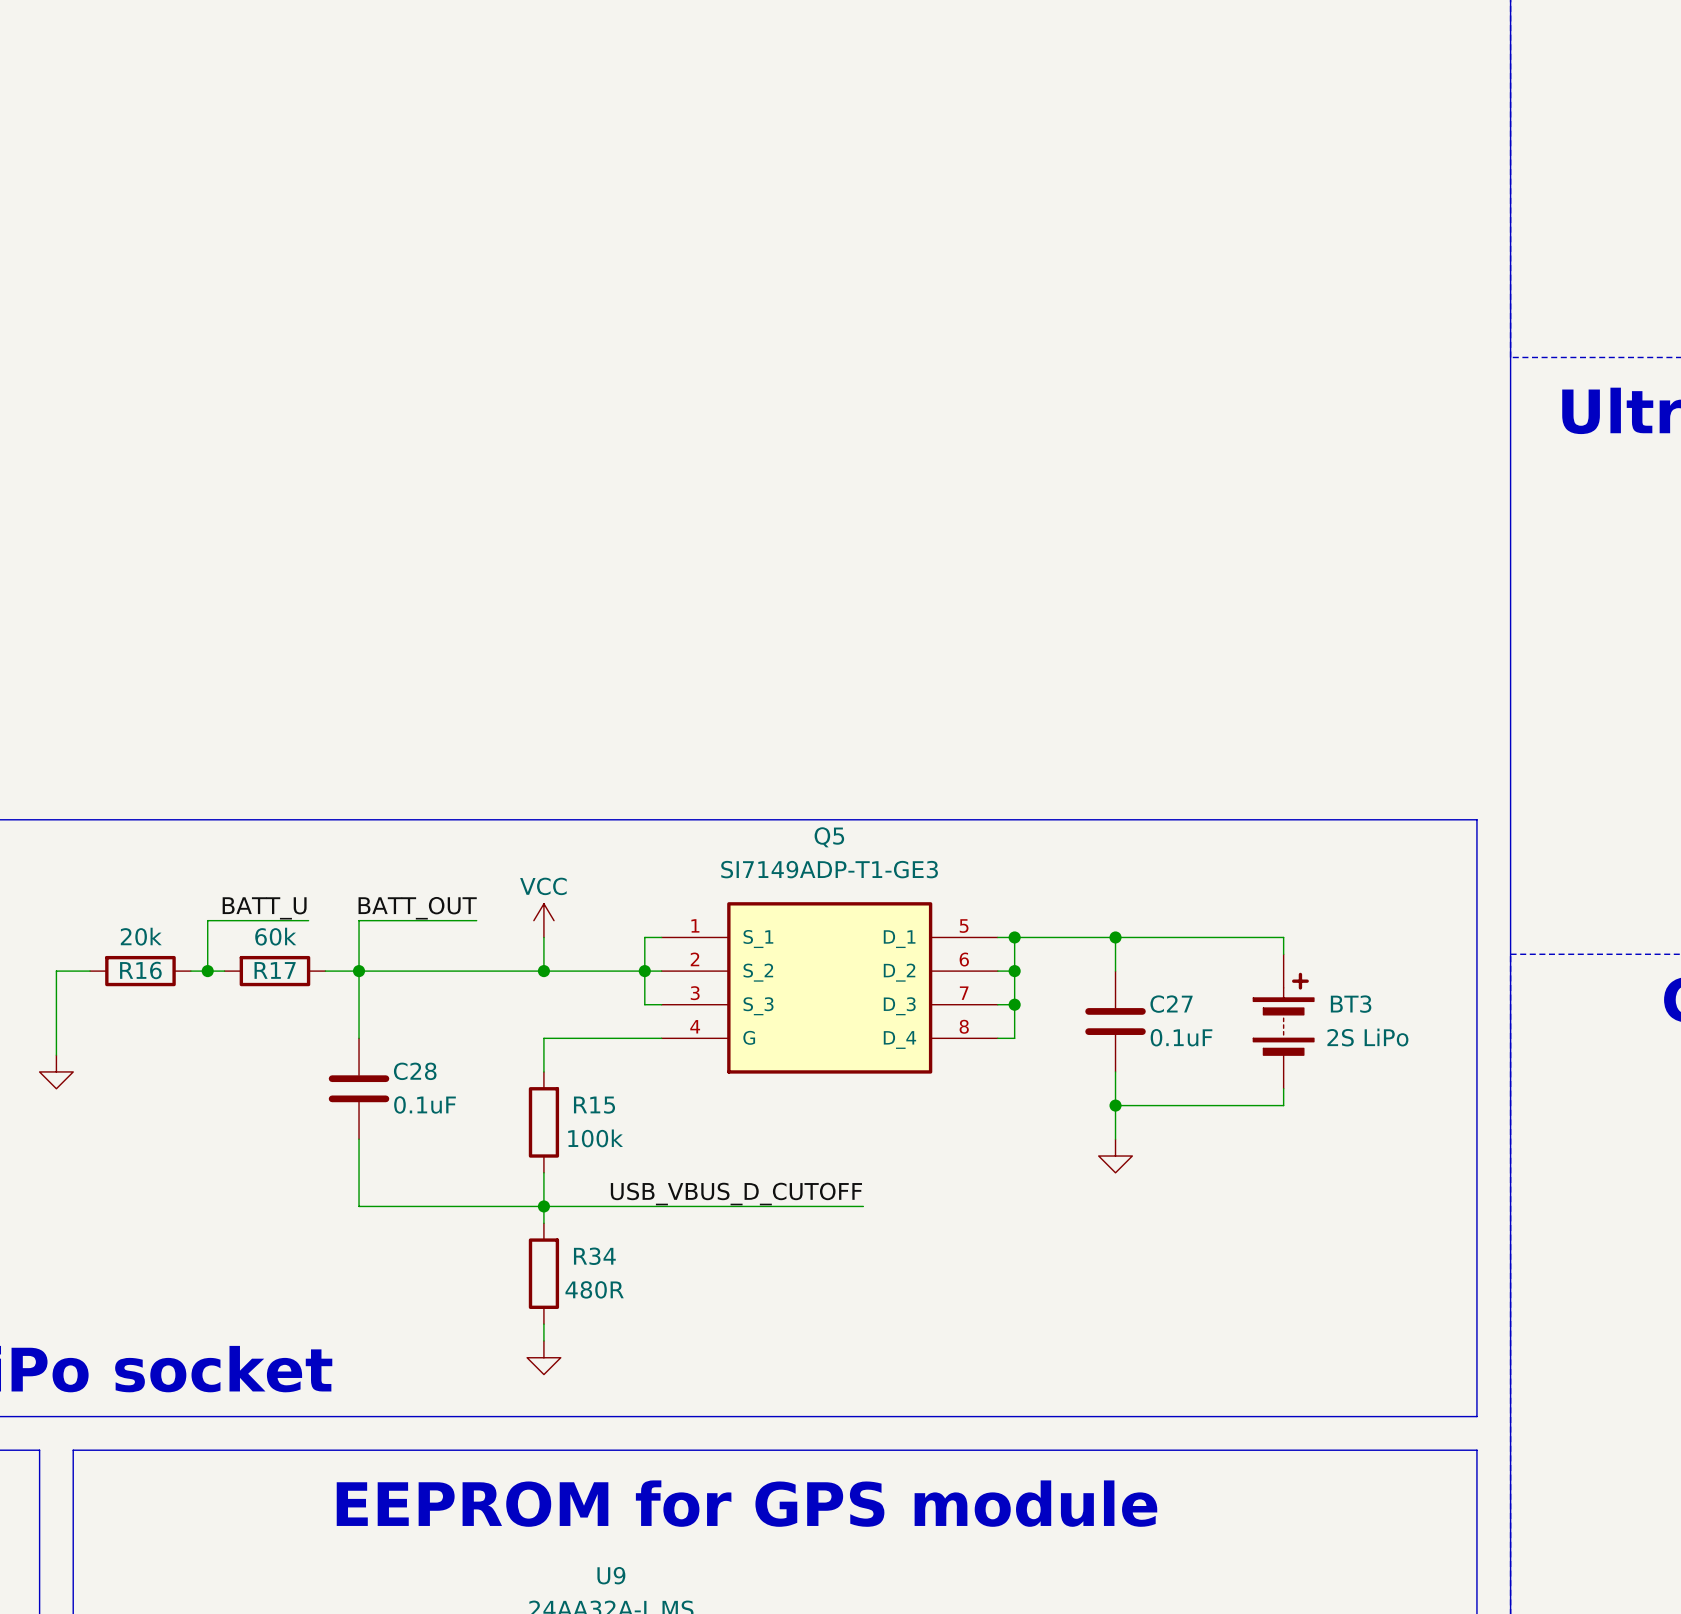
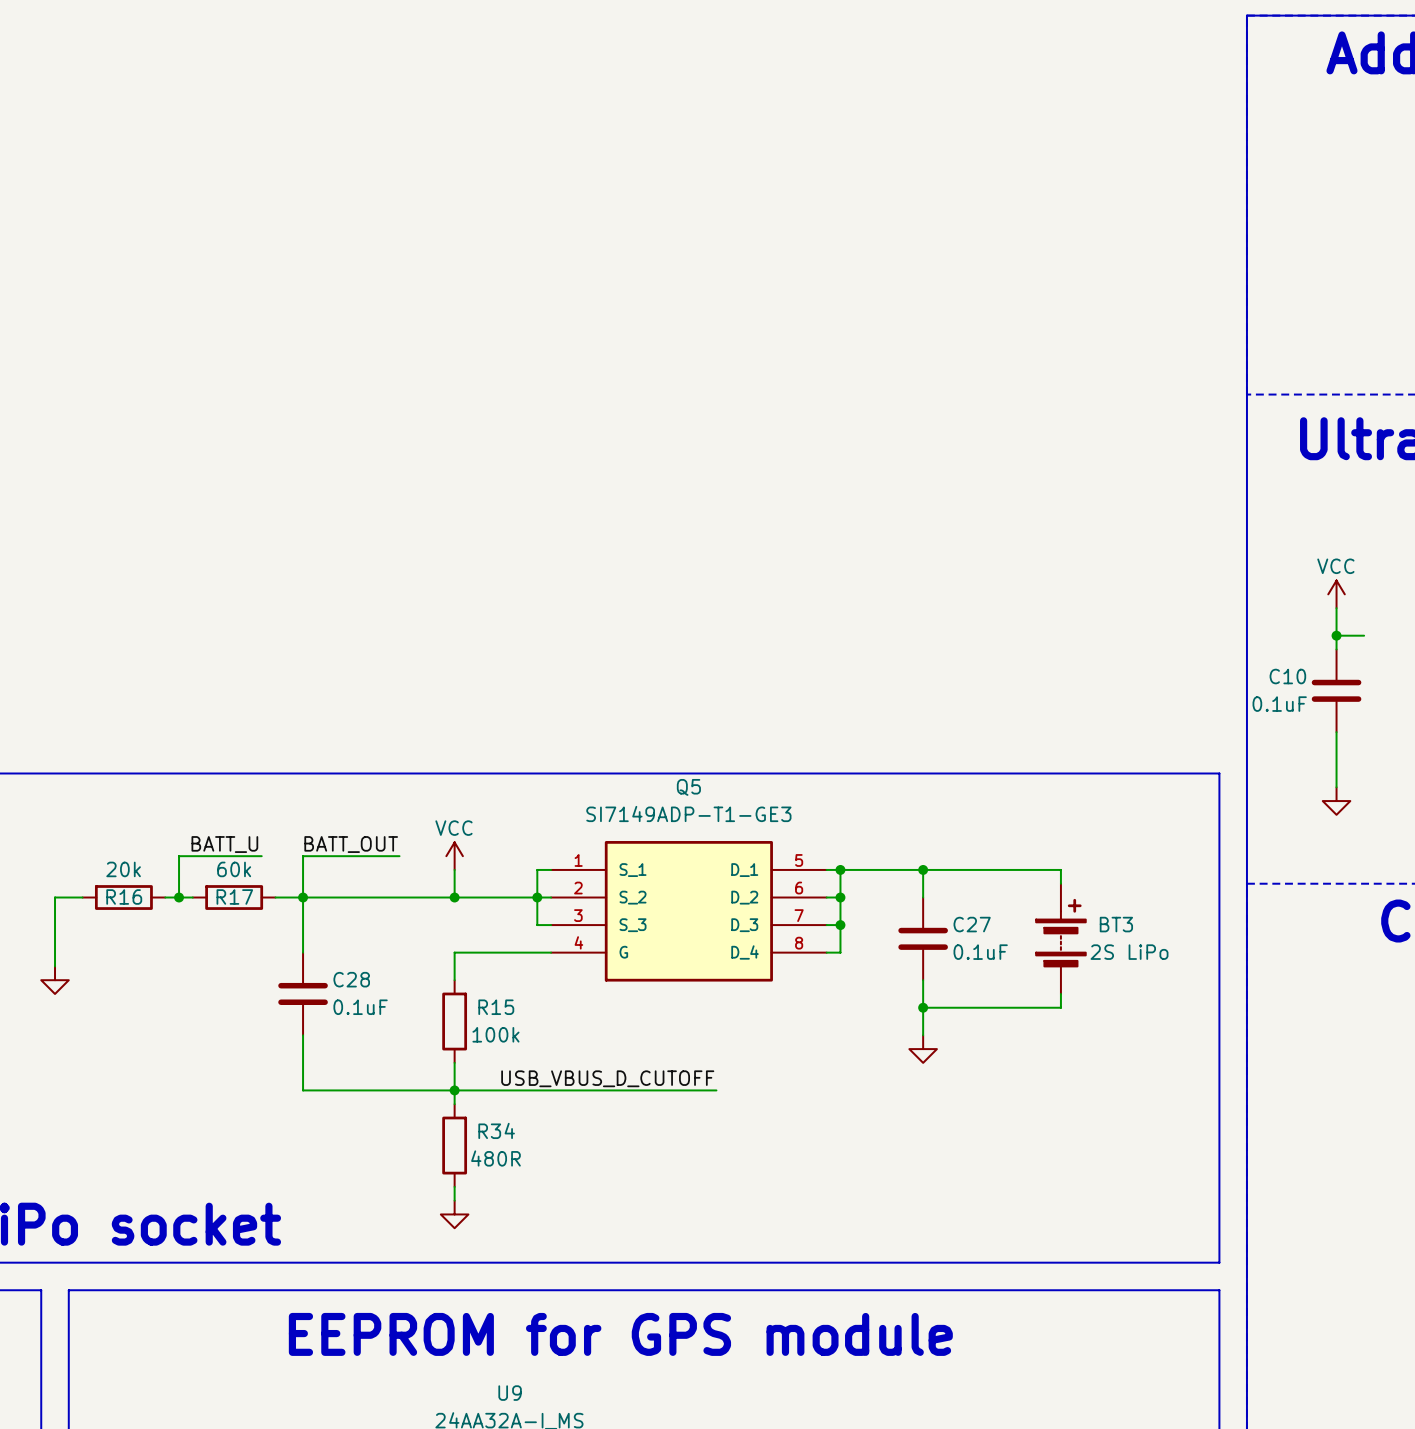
power symbol: none -> VCC (1336, 594)
wire: none -> (1336, 608) (1336, 649)
wire: none -> (1336, 635) (1364, 635)
junction: none -> (1336, 635)
C10: none -> 0.1uF (1336, 690)
wire: none -> (1336, 732) (1336, 787)
power symbol: none -> (1336, 801)

